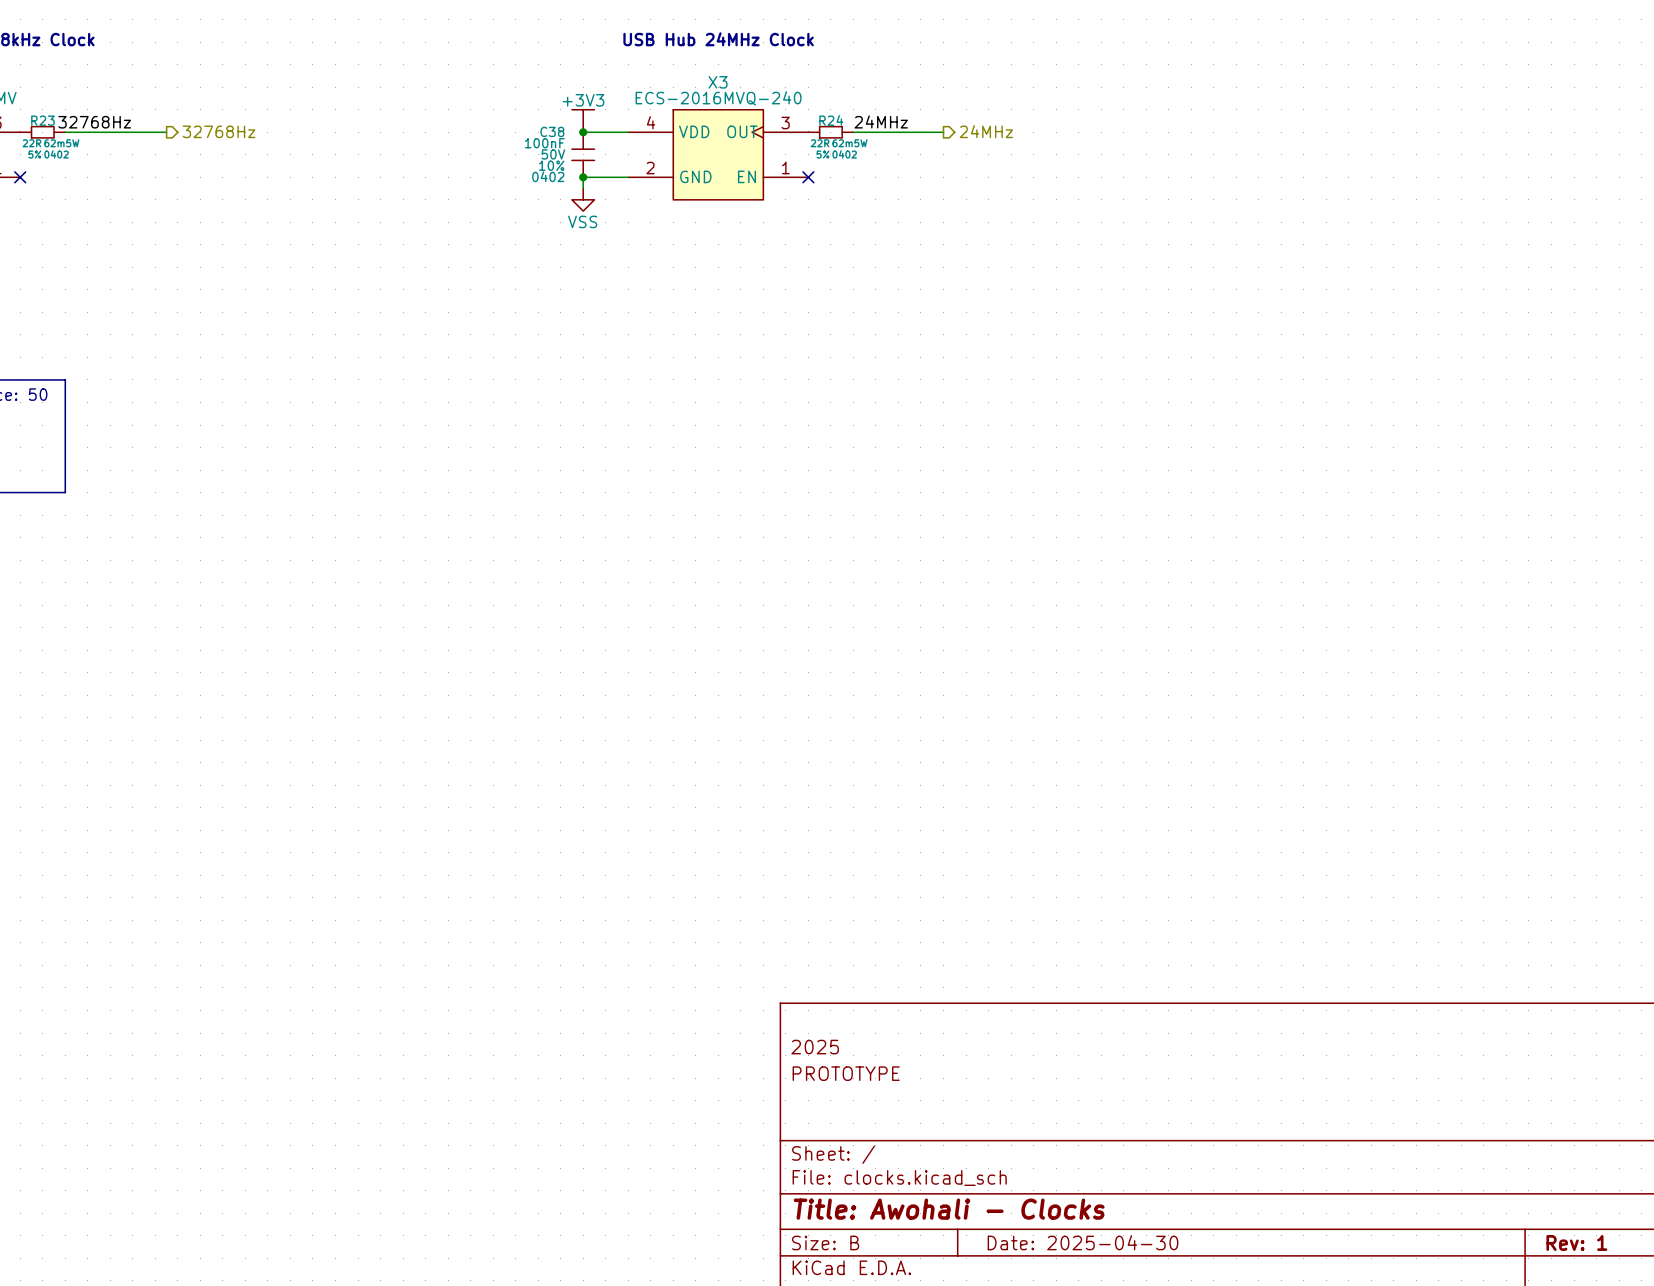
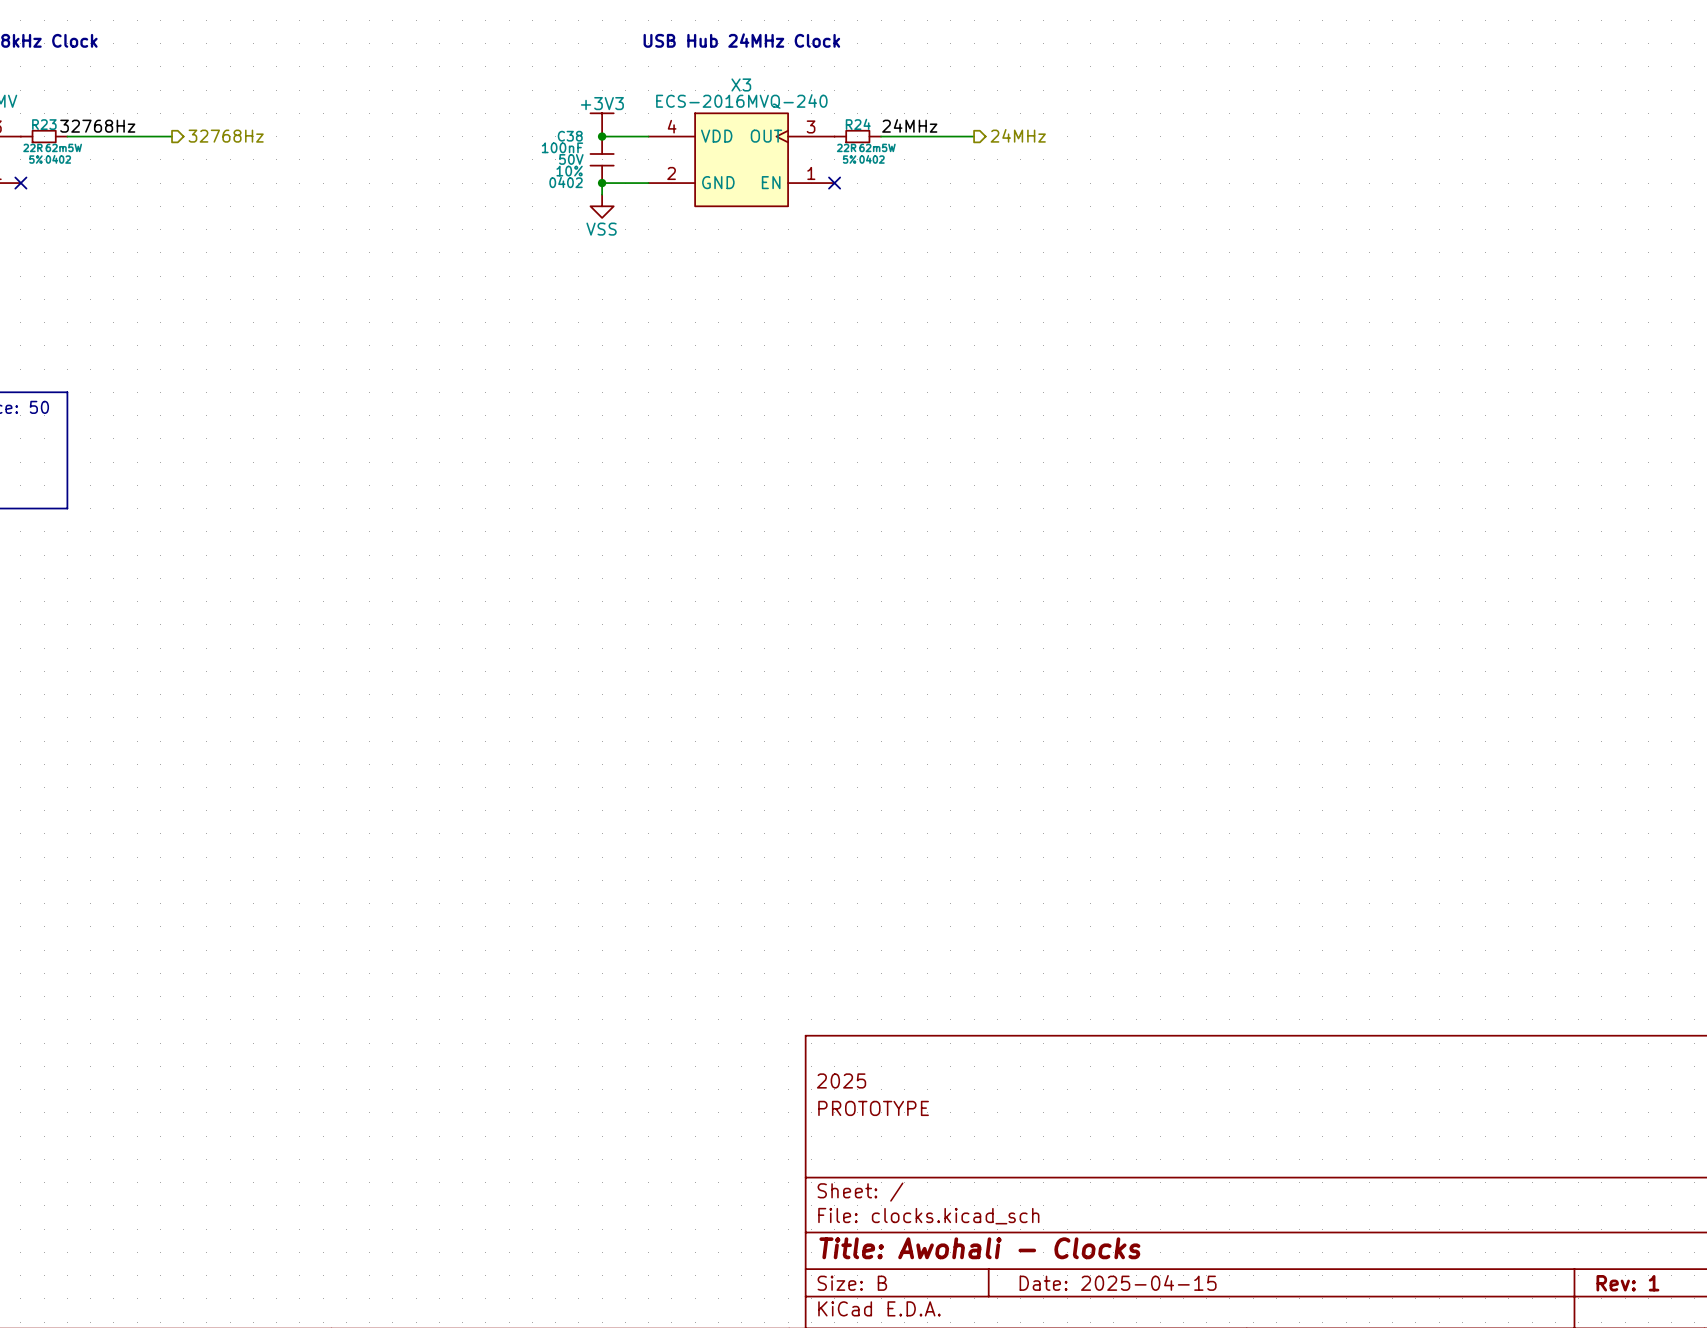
title block: Date: 2025-04-30 (1083, 1242) -> Date: 2025-04-15 (1118, 1282)

